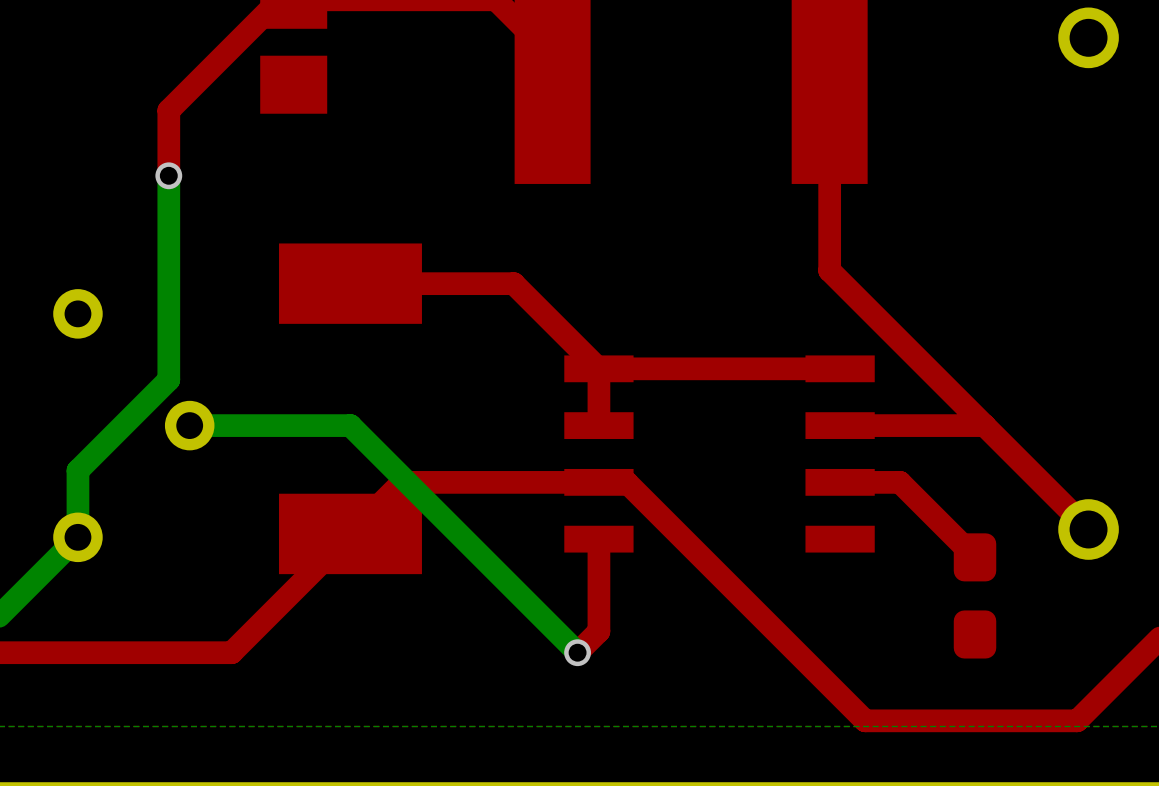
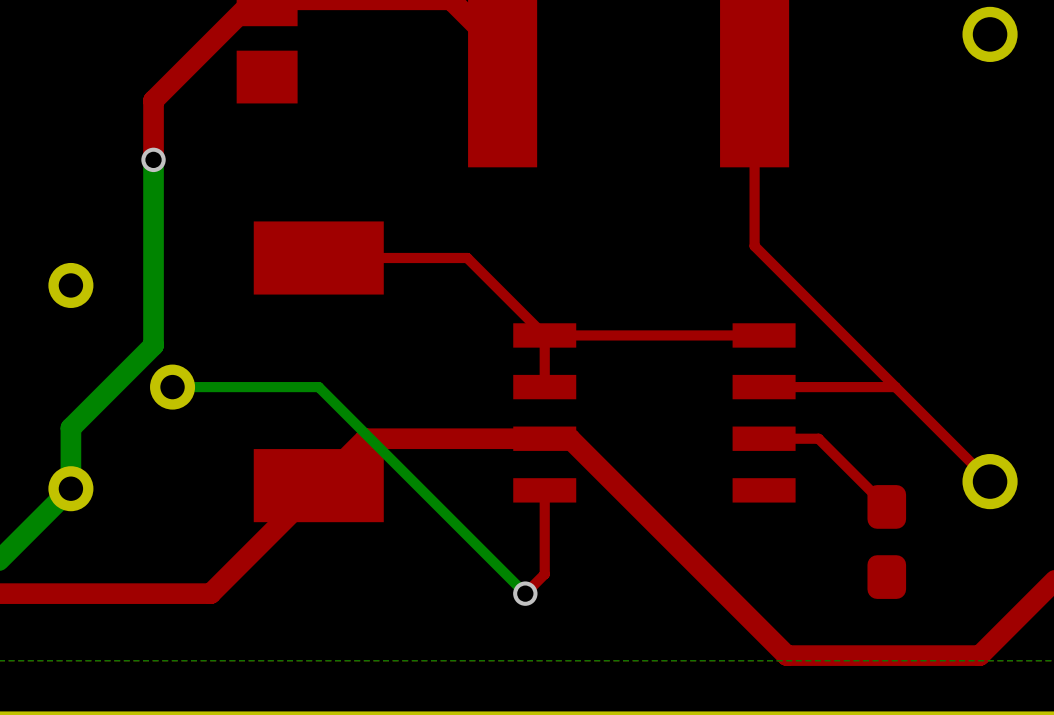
top track width: thick (829, 56) (829, 270) (1088, 529) -> thin (754, 51) (754, 246) (990, 481)
top track width: thick (350, 283) (513, 283) (598, 368) -> thin (318, 257) (467, 257) (544, 335)
top track width: thick (598, 368) (598, 425) -> thin (544, 335) (544, 387)
top track width: thick (840, 368) (598, 368) -> thin (764, 335) (544, 335)
bottom track width: thick (189, 425) (350, 425) (577, 652) -> thin (172, 387) (318, 387) (525, 593)
top track width: thick (984, 425) (840, 425) -> thin (895, 387) (764, 387)
top track width: thick (840, 482) (900, 482) (975, 557) -> thin (764, 438) (818, 438) (886, 506)
top track width: thick (598, 539) (598, 631) (577, 652) -> thin (544, 490) (544, 574) (525, 593)

